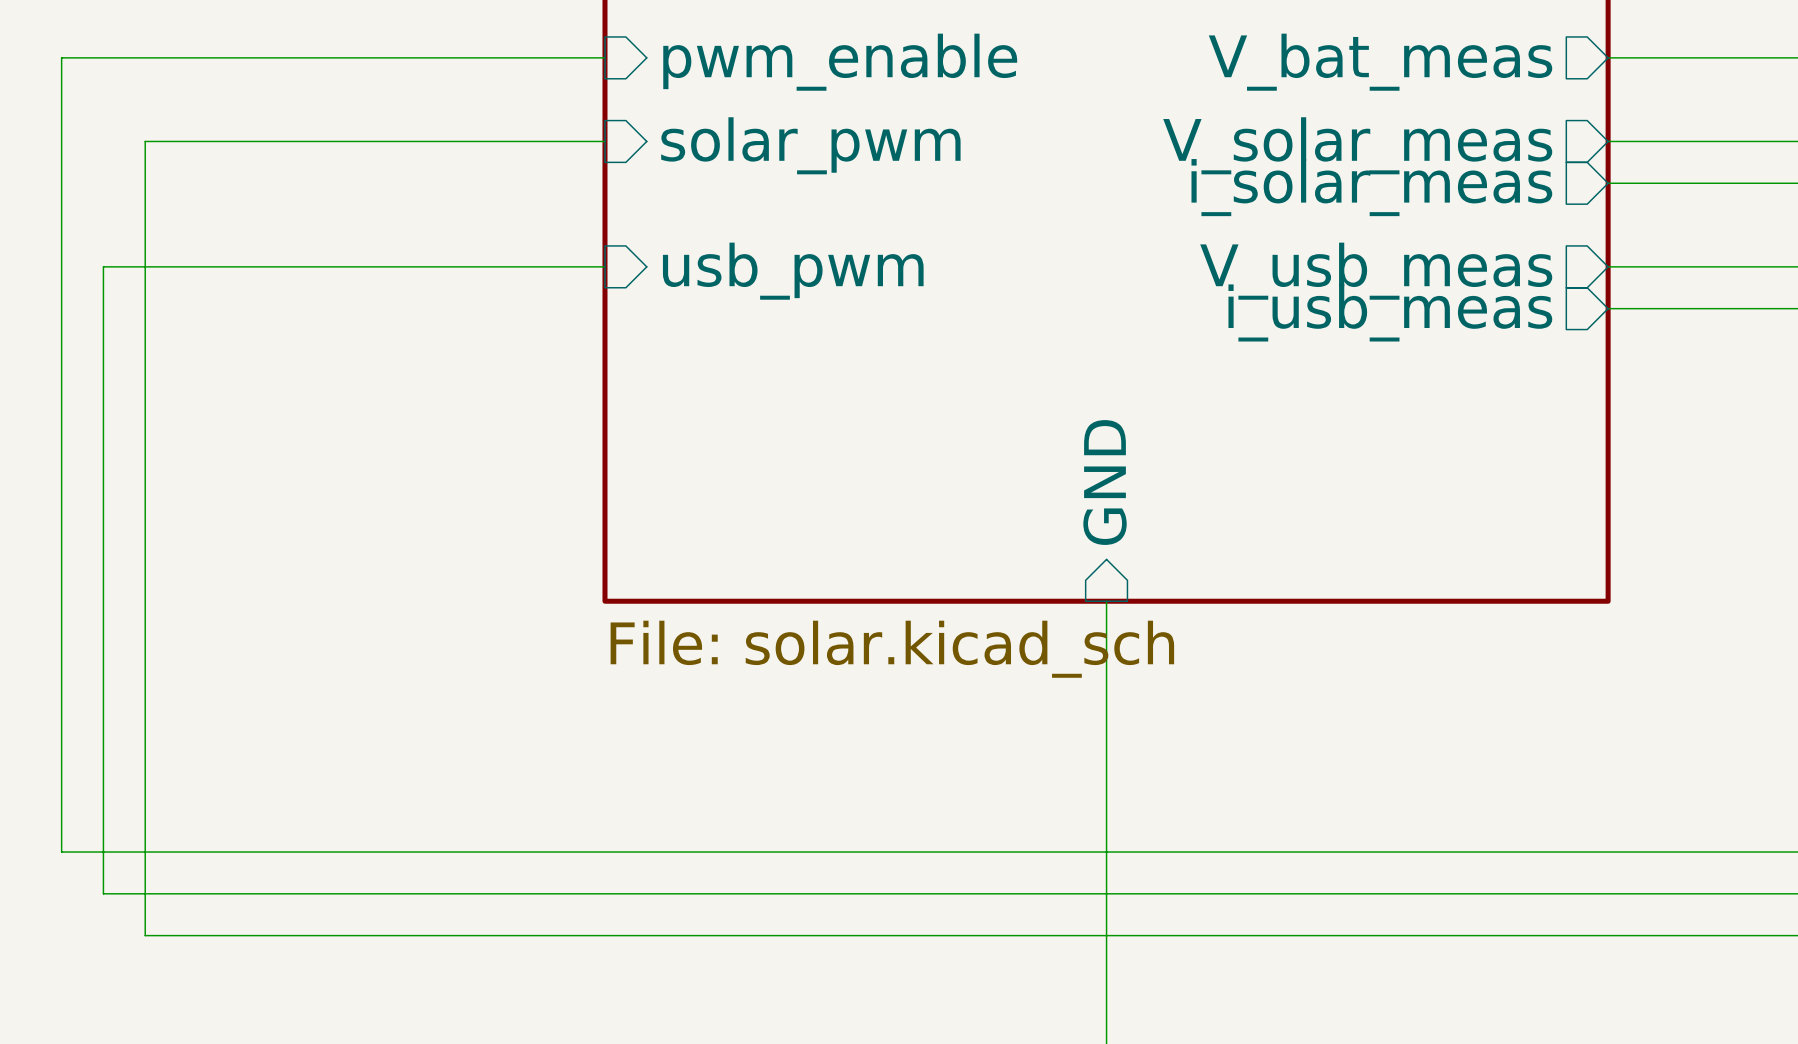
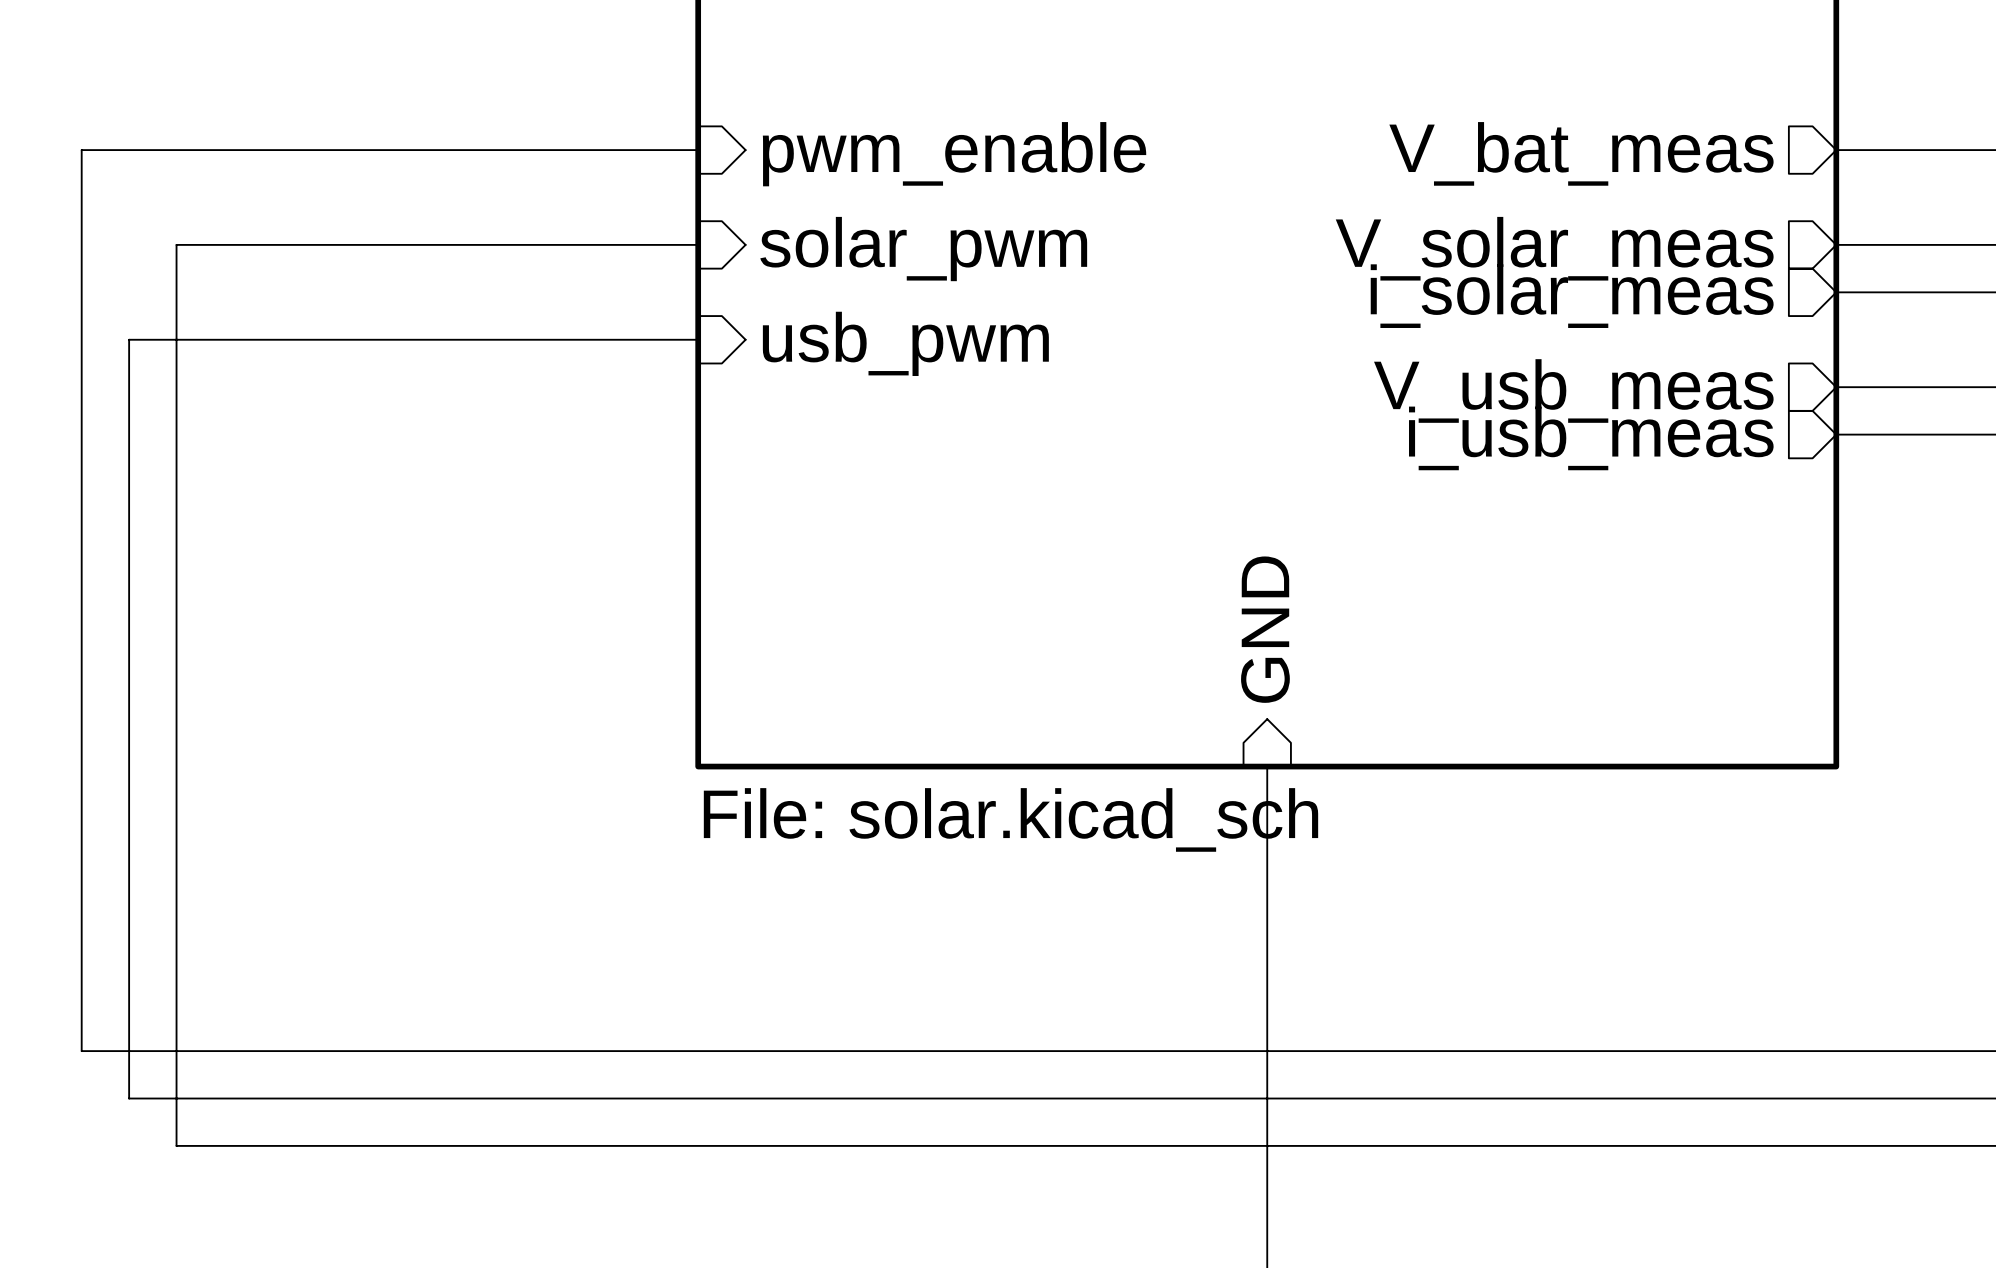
wire: (103, 266) (604, 266) -> (129, 387) (129, 339) (698, 339)
sheet pin position: usb_pwm (793, 271) -> usb_pwm (905, 343)

